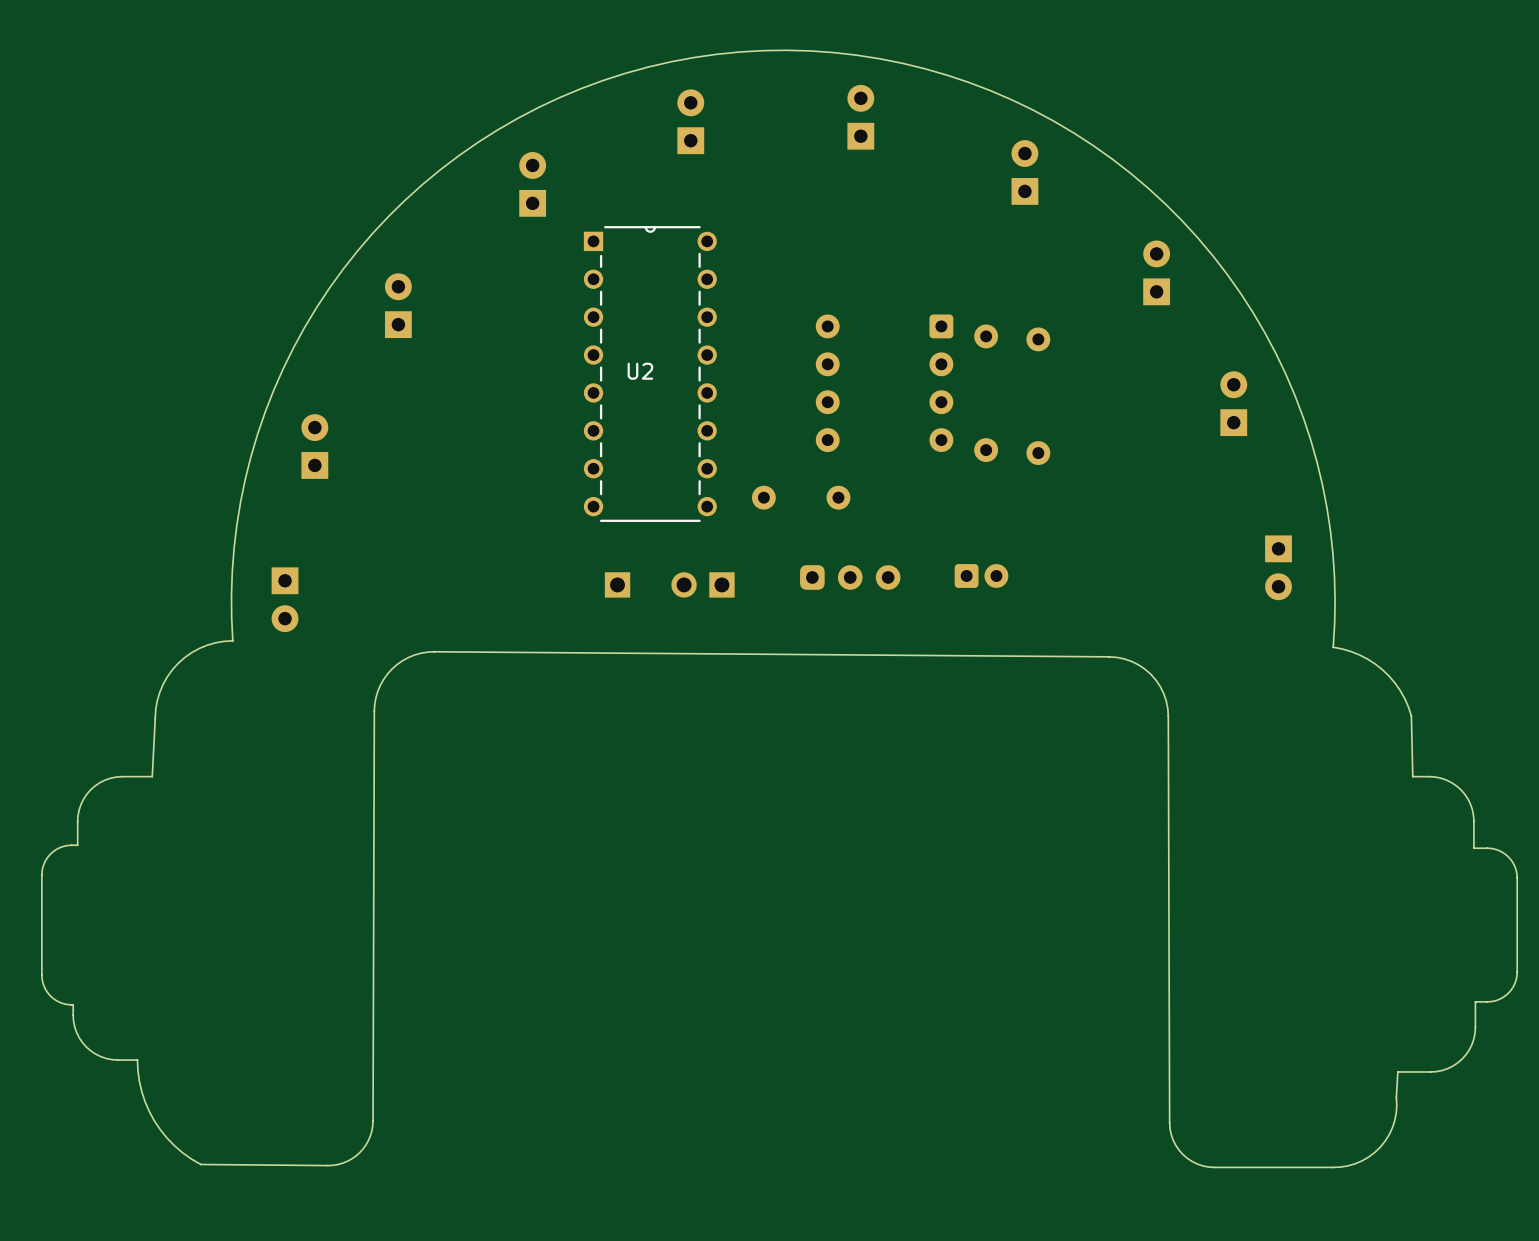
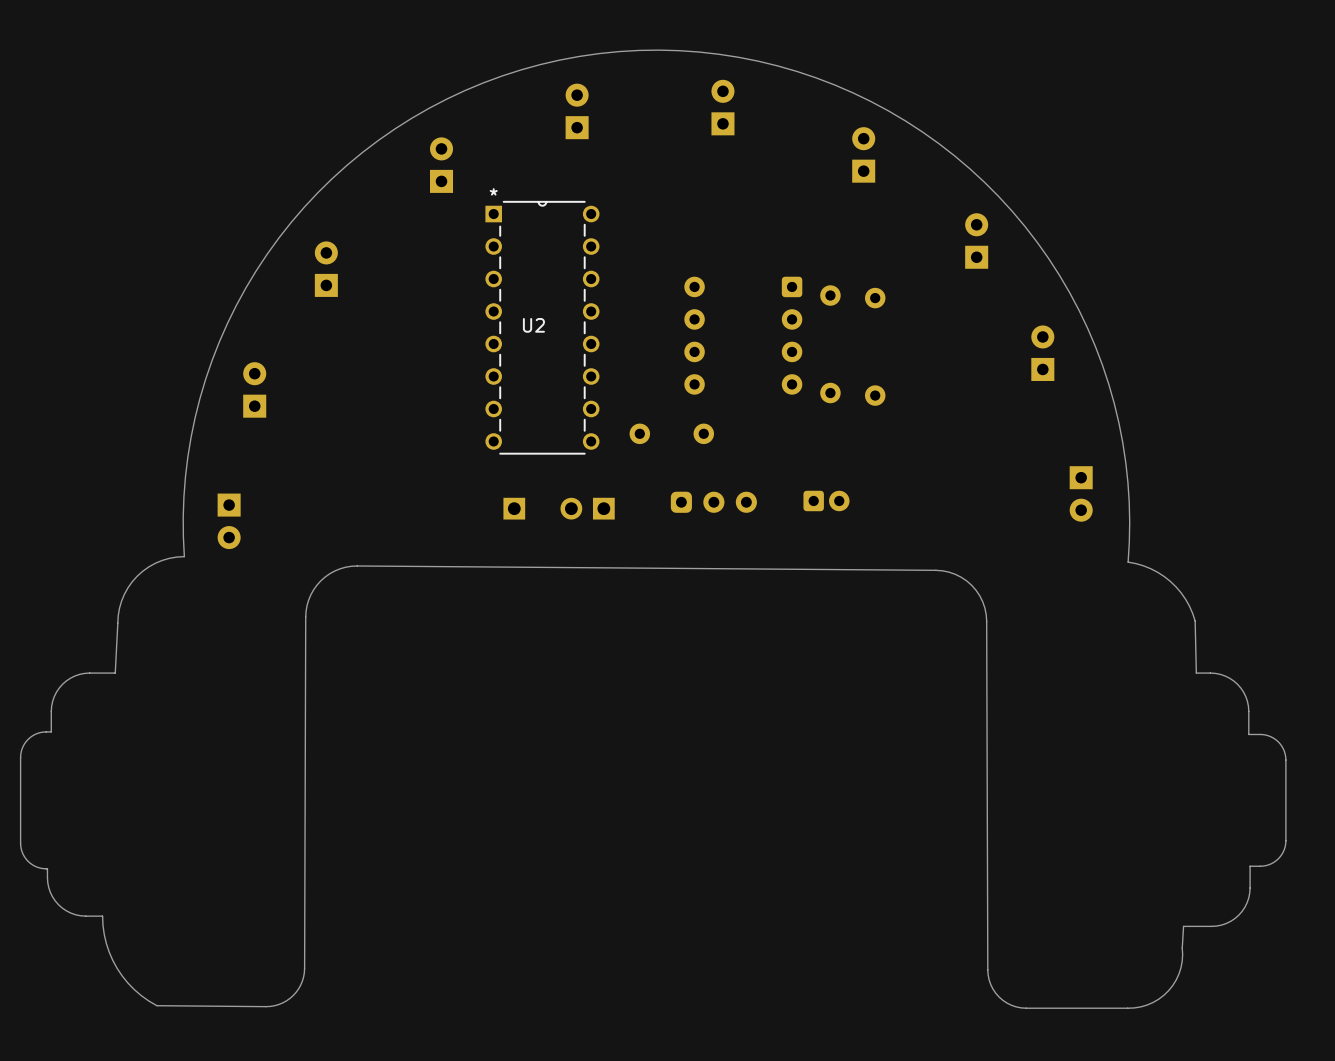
U2 text: none -> * (493, 191)

